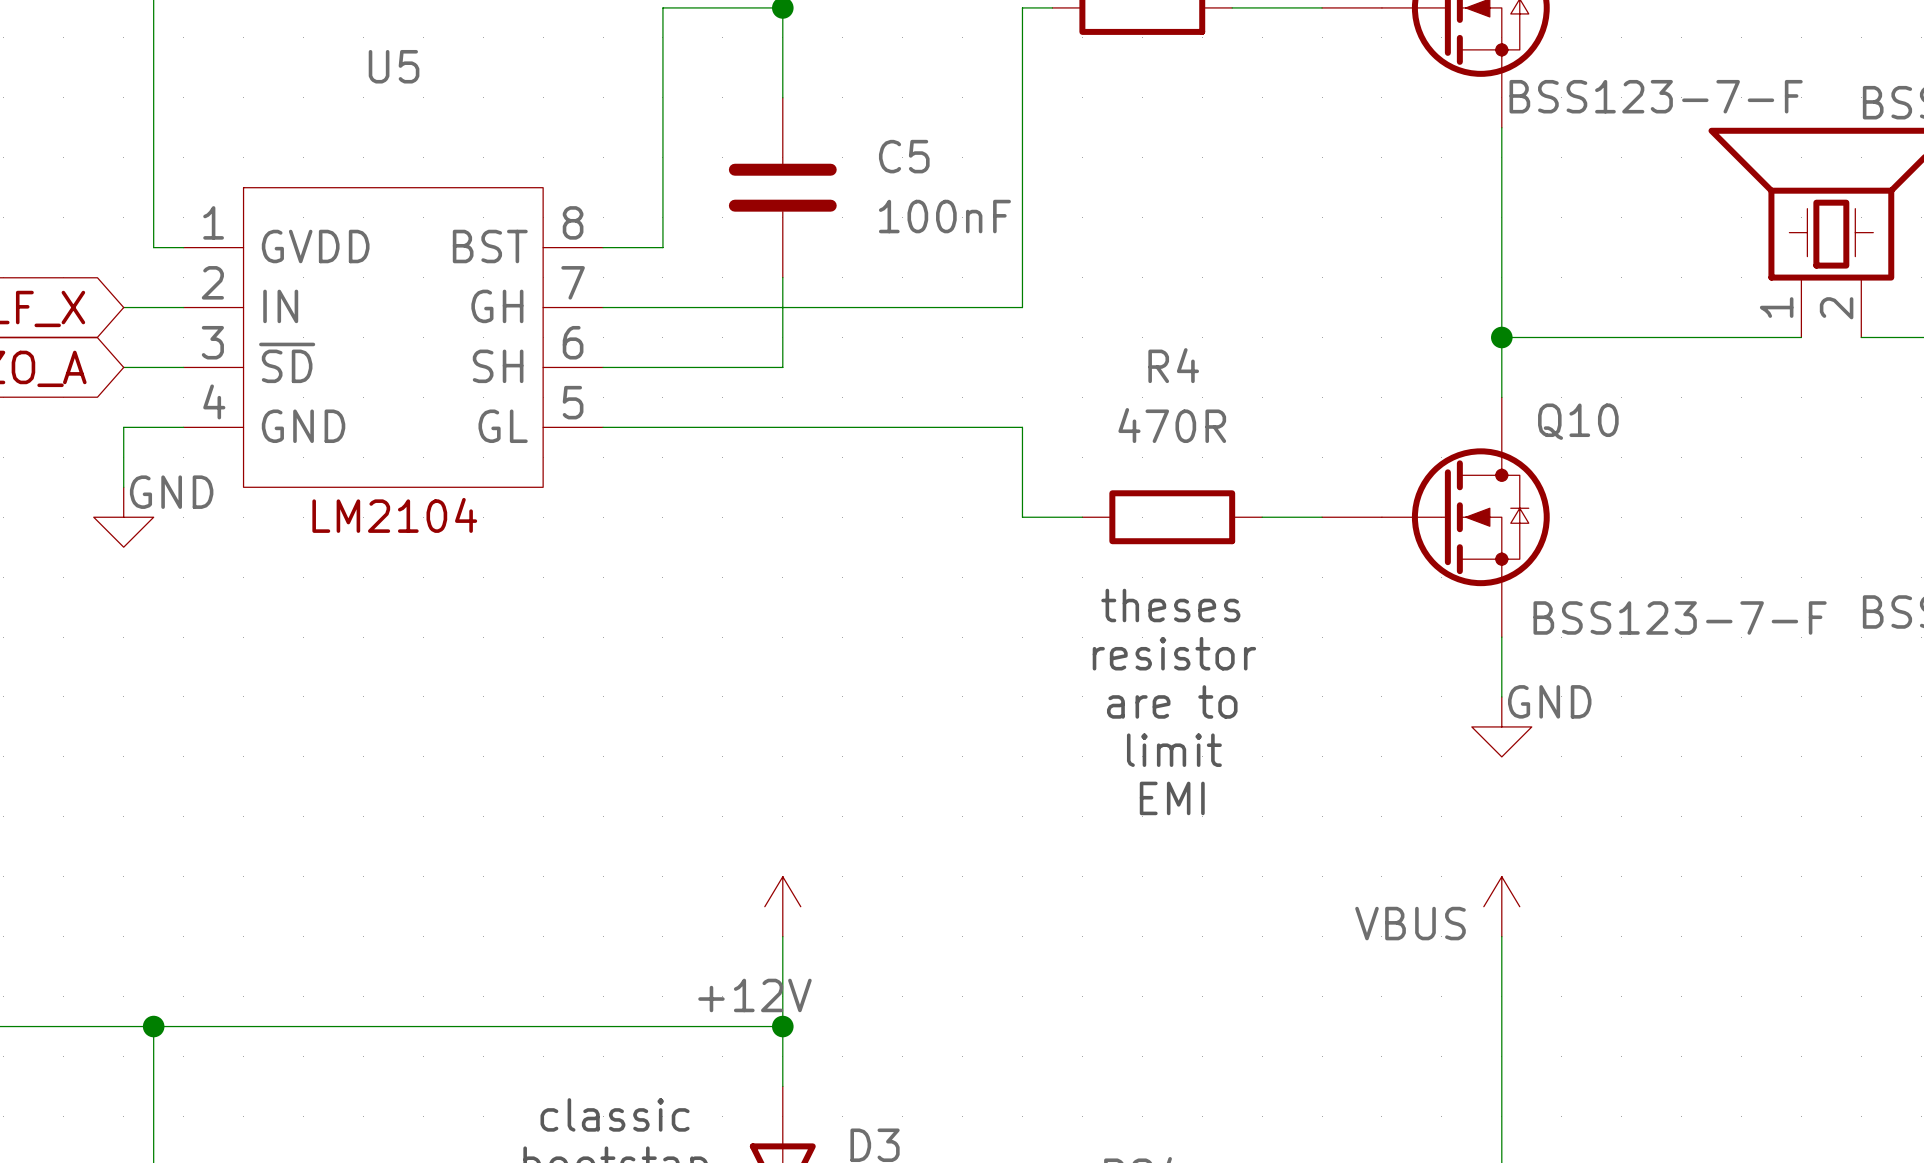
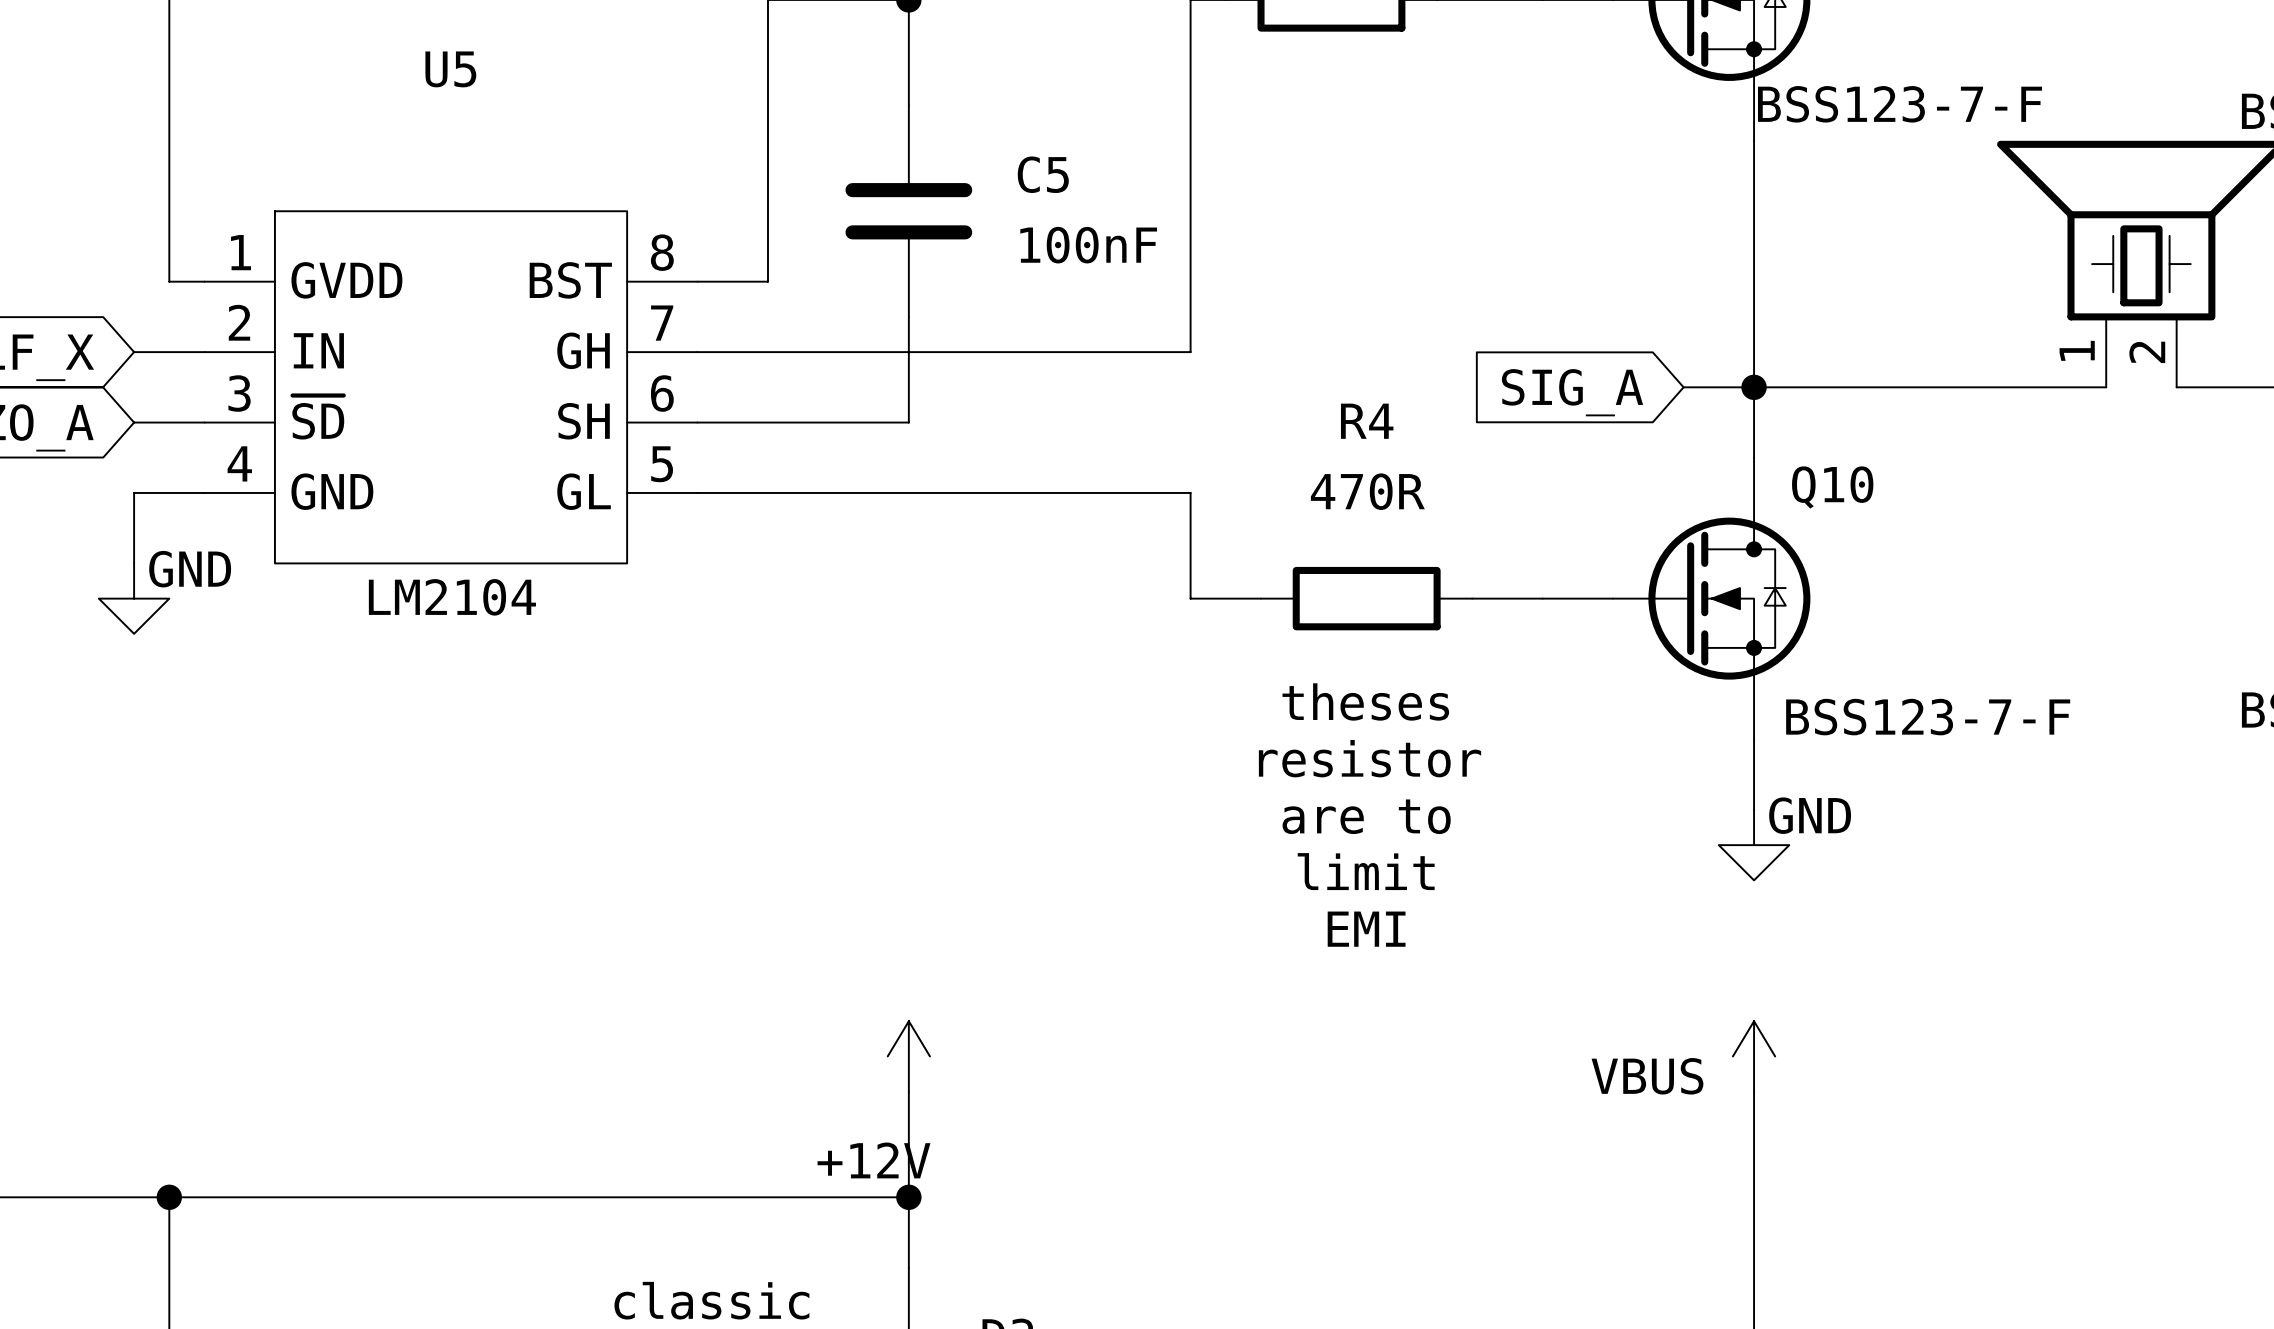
wire: none -> (1683, 387) (1754, 387)
global label: none -> SIG_A (1572, 392)

